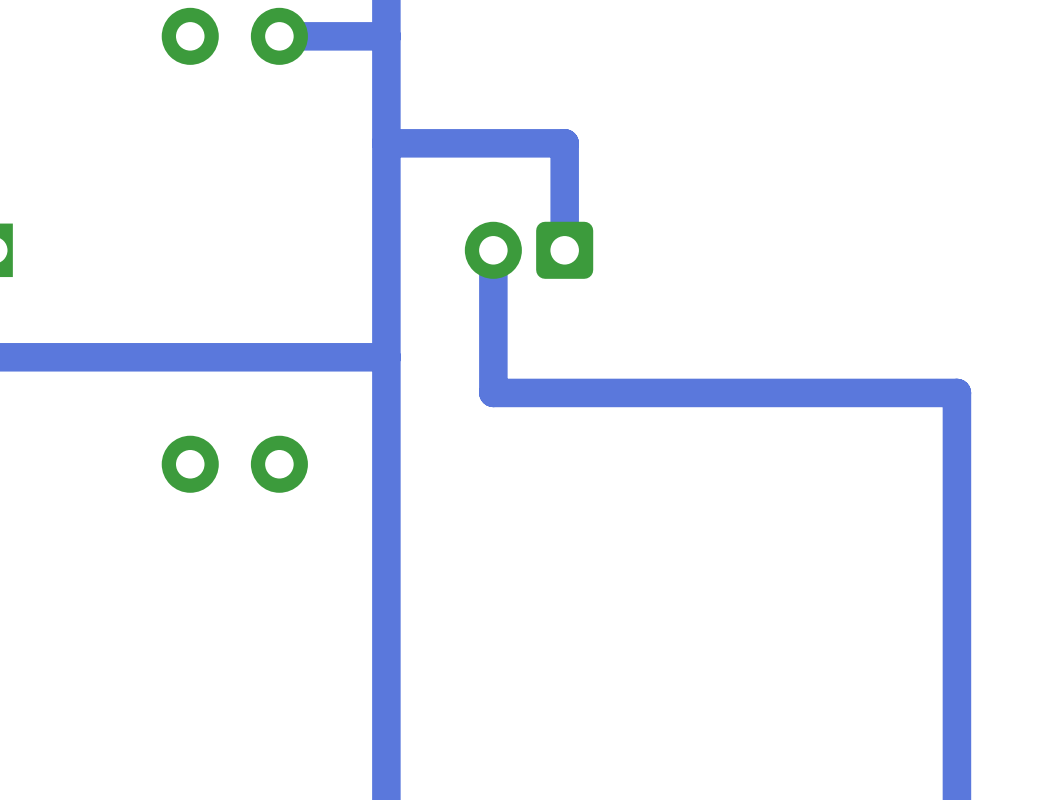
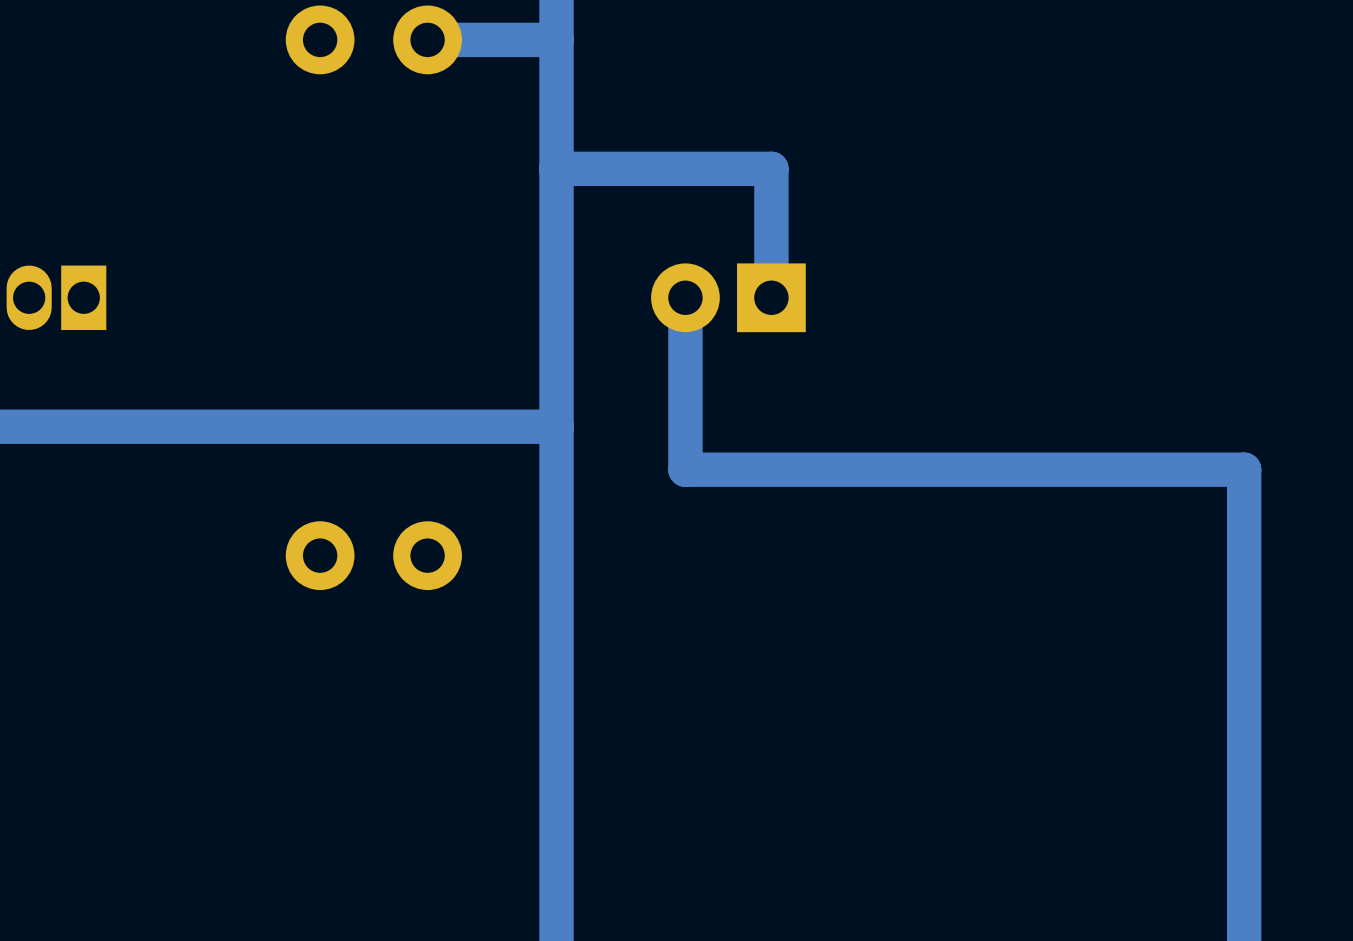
part footprint: [464, 221, 594, 279] -> [651, 263, 806, 333]

